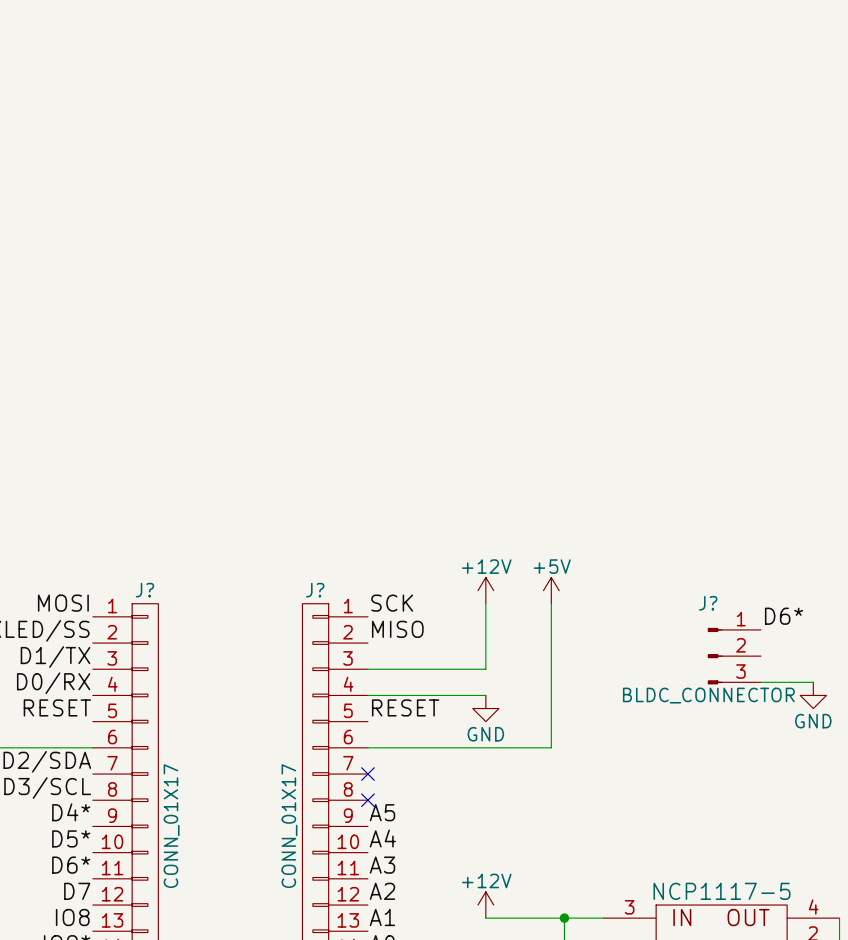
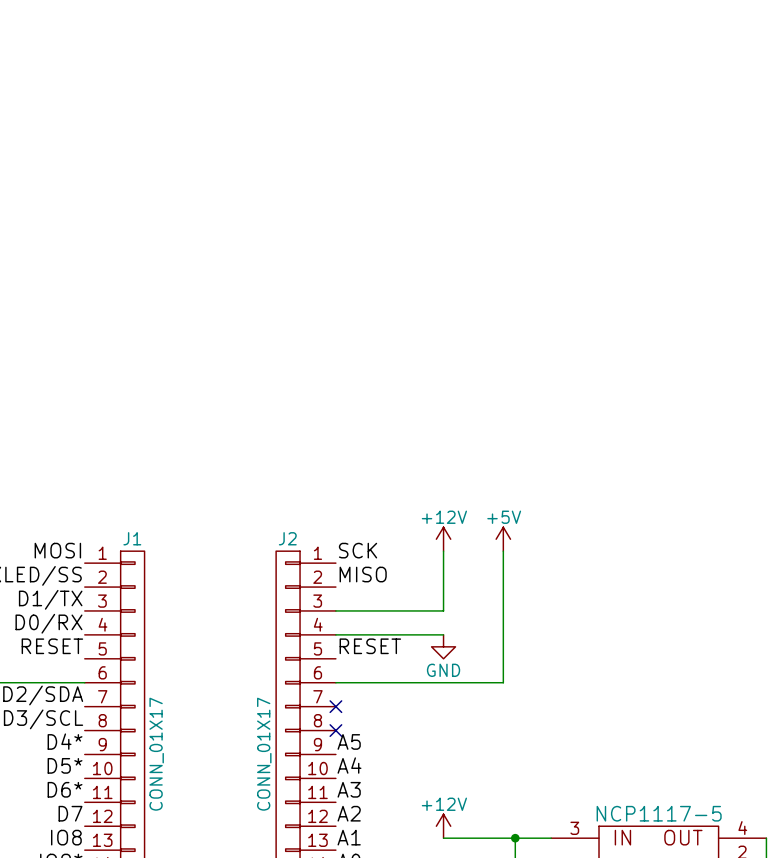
J? name: J? (144, 590) -> J1 (132, 538)
J? name: J? (315, 590) -> J2 (287, 538)
label: D6* (784, 616) -> none
J?: BLDC_CONNECTOR (734, 656) -> none
wire: (760, 682) (813, 682) -> none
power symbol: GND (813, 695) -> none

